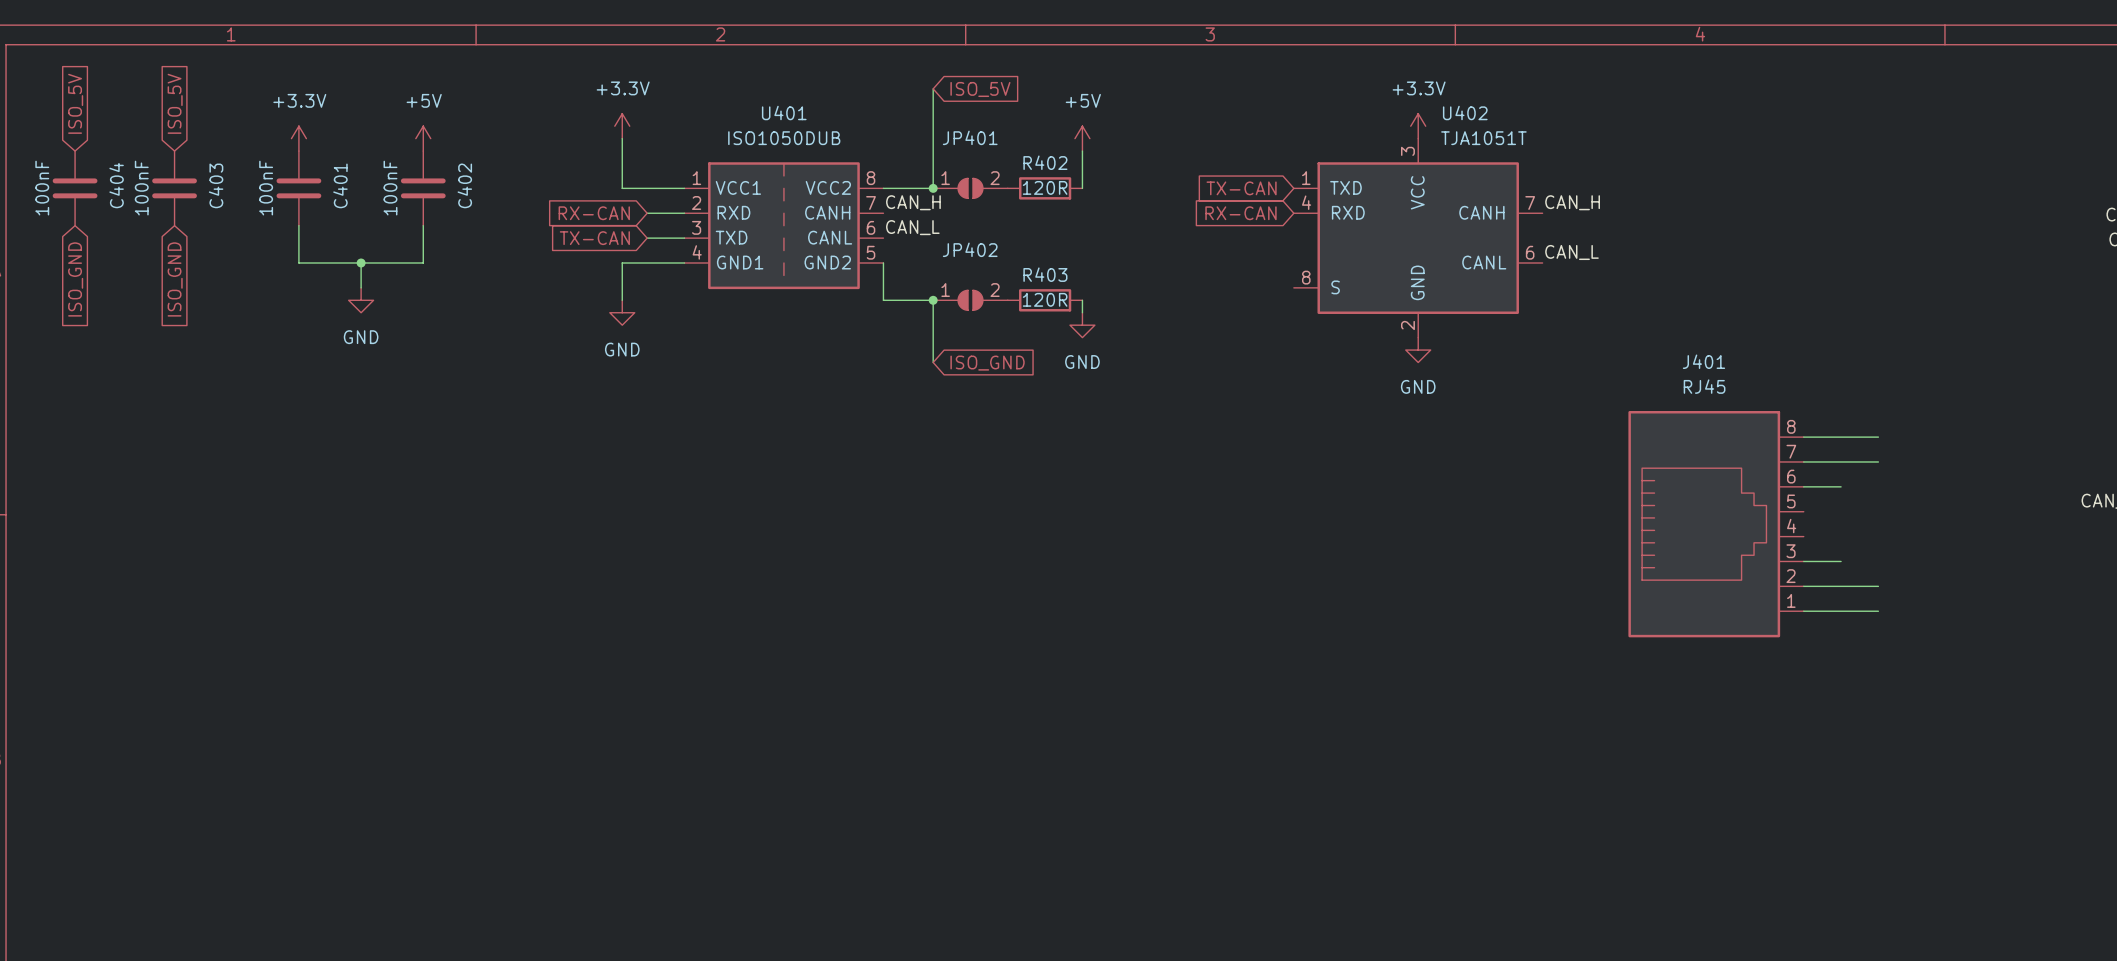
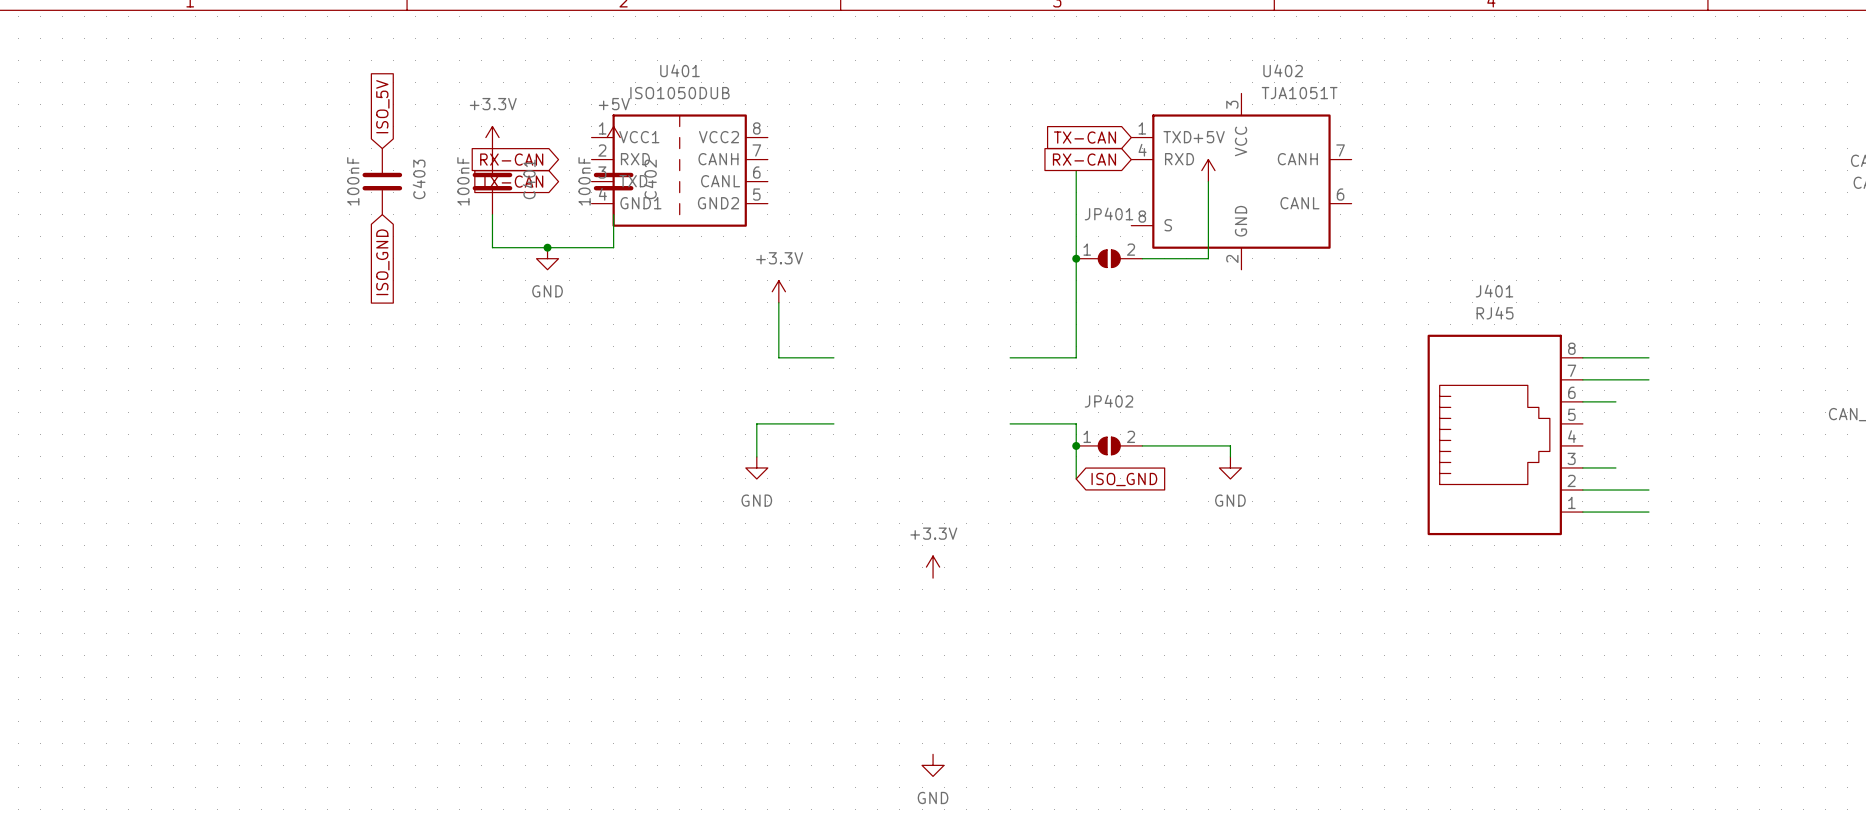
wire: (933, 88) (933, 188) (883, 188) -> none
global label: ISO_5V (980, 89) -> none
global label: ISO_5V (75, 103) -> none
global label: ISO_5V (175, 103) -> none
power symbol position: +3.3V (622, 126) -> +3.3V (492, 137)
power symbol: +3.3V (1418, 126) -> none
power symbol: +3.3V (298, 138) -> none
power symbol: +5V (423, 138) -> none
wire: (622, 138) (622, 188) (684, 188) -> none
power symbol: +5V (1082, 138) -> none
wire: (1082, 151) (1082, 188) -> none
global label: none -> ISO_5V (382, 106)
C404: 100nF (75, 188) -> none
C403 position: (174, 188) -> (382, 181)
C401 position: (298, 188) -> (492, 181)
C402 position: (423, 188) -> (613, 181)
power symbol: none -> +5V (613, 137)
junction: (933, 188) -> none
JP401 position: (970, 188) -> (1109, 258)
R402: 120R (1045, 188) -> none
label: CAN_H (913, 202) -> none
label: CAN_H (1572, 202) -> none
wire: (647, 213) (684, 213) -> none
wire: (298, 225) (298, 262) (423, 262) (423, 225) -> none
wire: none -> (1076, 170) (1076, 357) (1010, 357)
power symbol: none -> +5V (1208, 170)
label: CAN_L (912, 227) -> none
wire: (647, 238) (684, 238) -> none
wire: none -> (1208, 181) (1208, 258) (1142, 258)
label: CAN_L (1572, 252) -> none
wire: (361, 262) (361, 287) -> none
junction: (361, 262) -> none
wire: (684, 262) (622, 262) (622, 300) -> none
wire: (883, 262) (883, 300) (933, 300) (933, 362) -> none
wire: none -> (492, 214) (492, 247) (613, 247) (613, 214)
global label: ISO_GND (75, 279) -> none
global label: ISO_GND (175, 279) -> none
power symbol: GND (361, 300) -> none
junction: (933, 300) -> none
JP402 position: (970, 300) -> (1109, 445)
R403: 120R (1045, 300) -> none
wire: (1082, 300) (1082, 312) -> none
power symbol position: GND (622, 312) -> GND (547, 258)
junction: none -> (547, 247)
power symbol: GND (1082, 325) -> none
junction: none -> (1076, 258)
global label: none -> ISO_GND (382, 262)
power symbol: GND (1418, 350) -> none
power symbol: none -> +3.3V (778, 291)
global label: ISO_GND (987, 363) -> none
wire: none -> (778, 302) (778, 357) (833, 357)
wire: none -> (833, 423) (756, 423) (756, 456)
wire: none -> (1010, 423) (1076, 423) (1076, 478)
junction: none -> (1076, 445)
wire: none -> (1142, 445) (1230, 445) (1230, 456)
power symbol: none -> GND (756, 467)
power symbol: none -> GND (1230, 467)
global label: none -> ISO_GND (1124, 479)
power symbol: none -> +3.3V (933, 567)
power symbol: none -> GND (933, 765)

